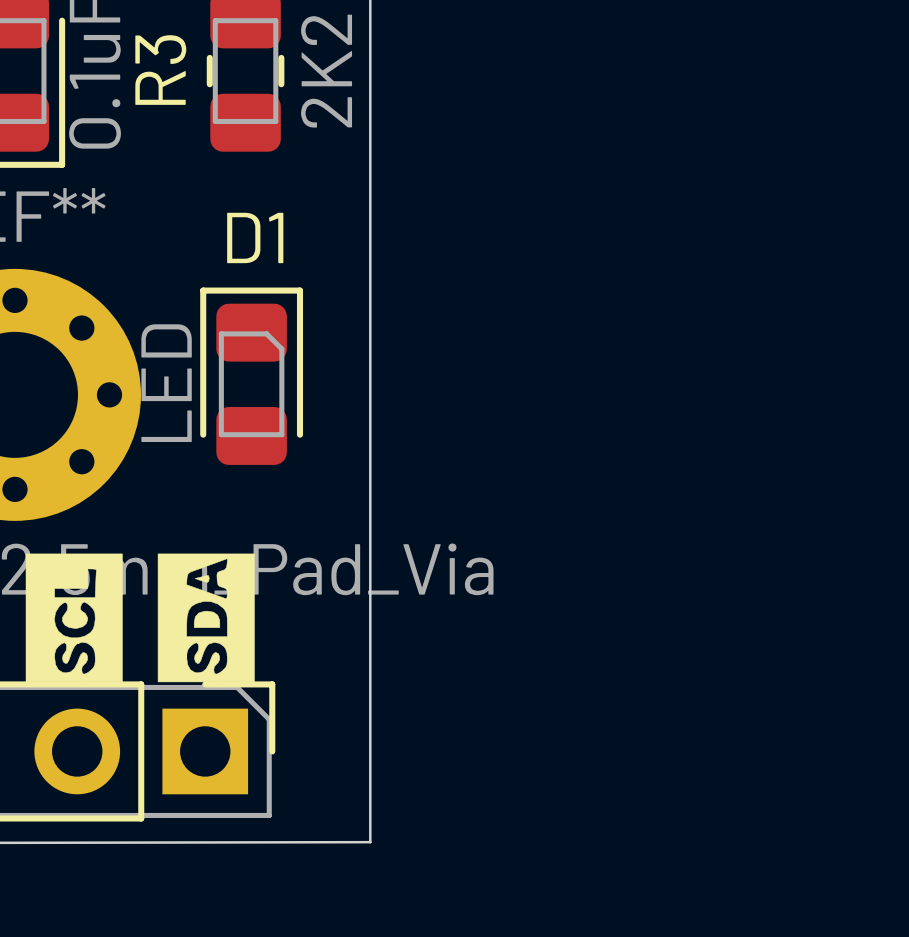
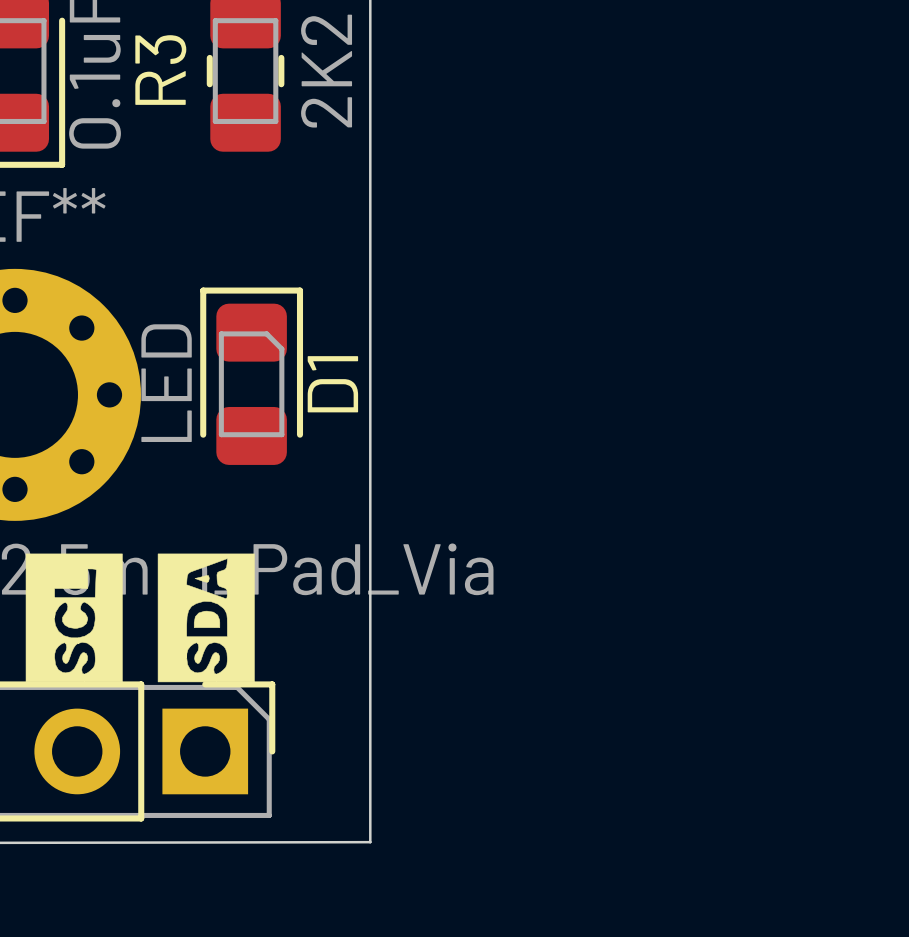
D1 name rotation: 0° (255, 237) -> 90° counterclockwise (332, 384)
D1 name position: D1 (255, 237) -> D1 (332, 384)

